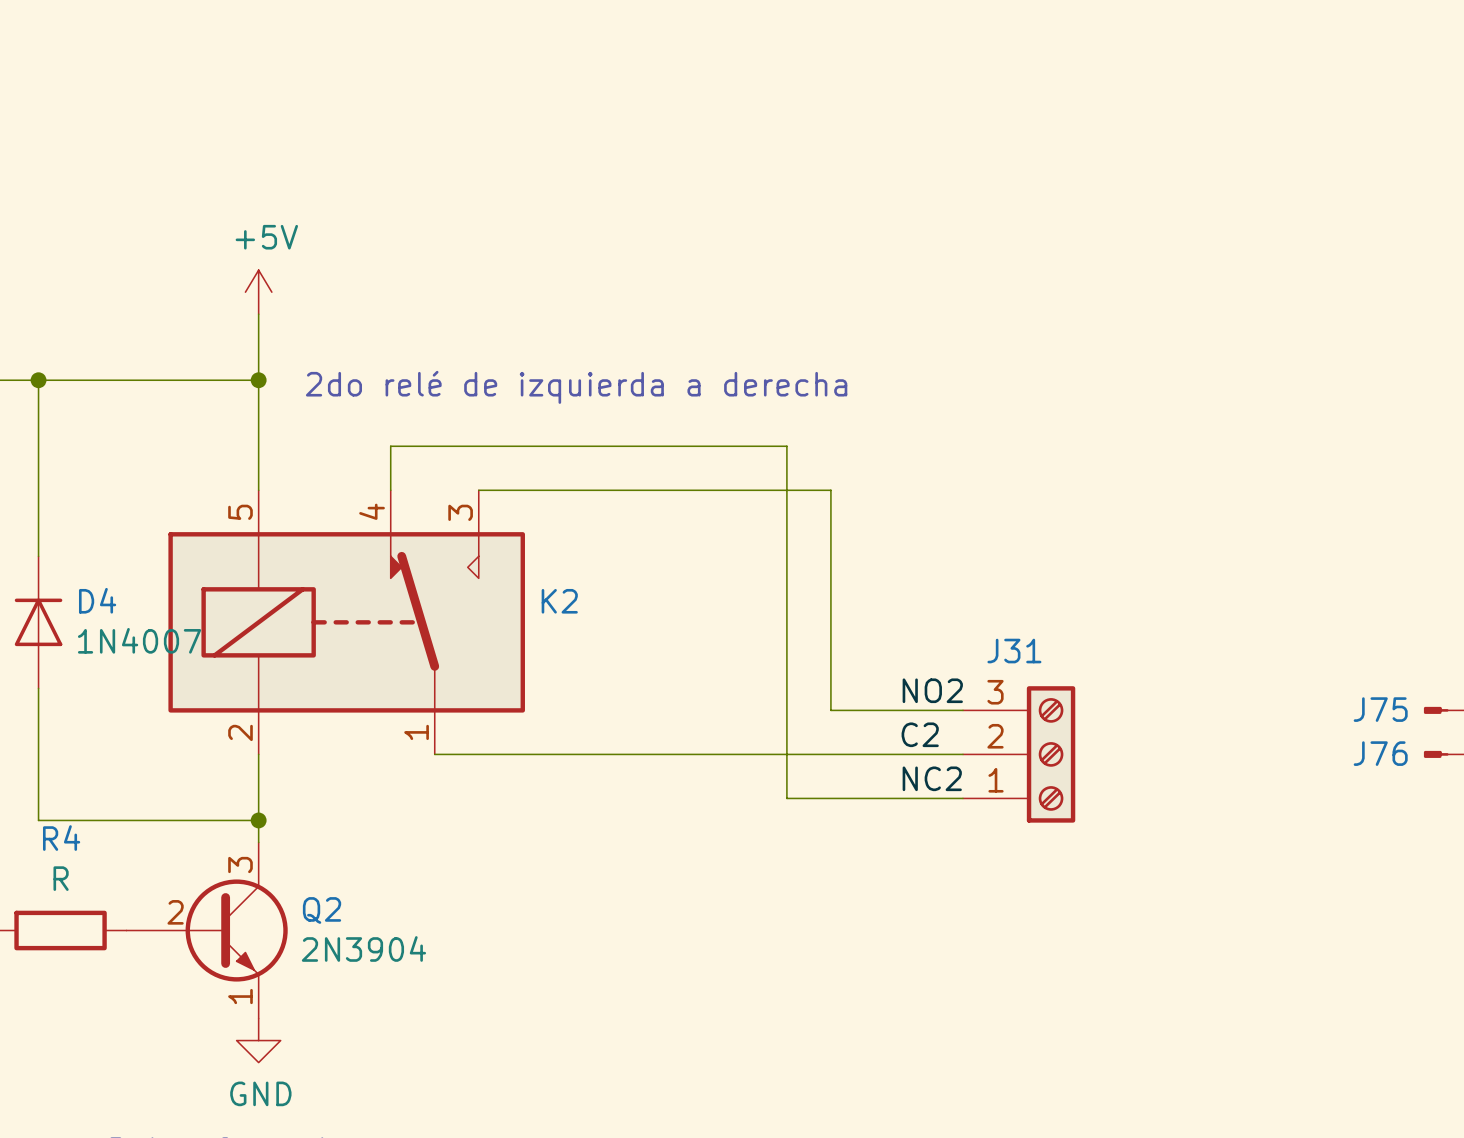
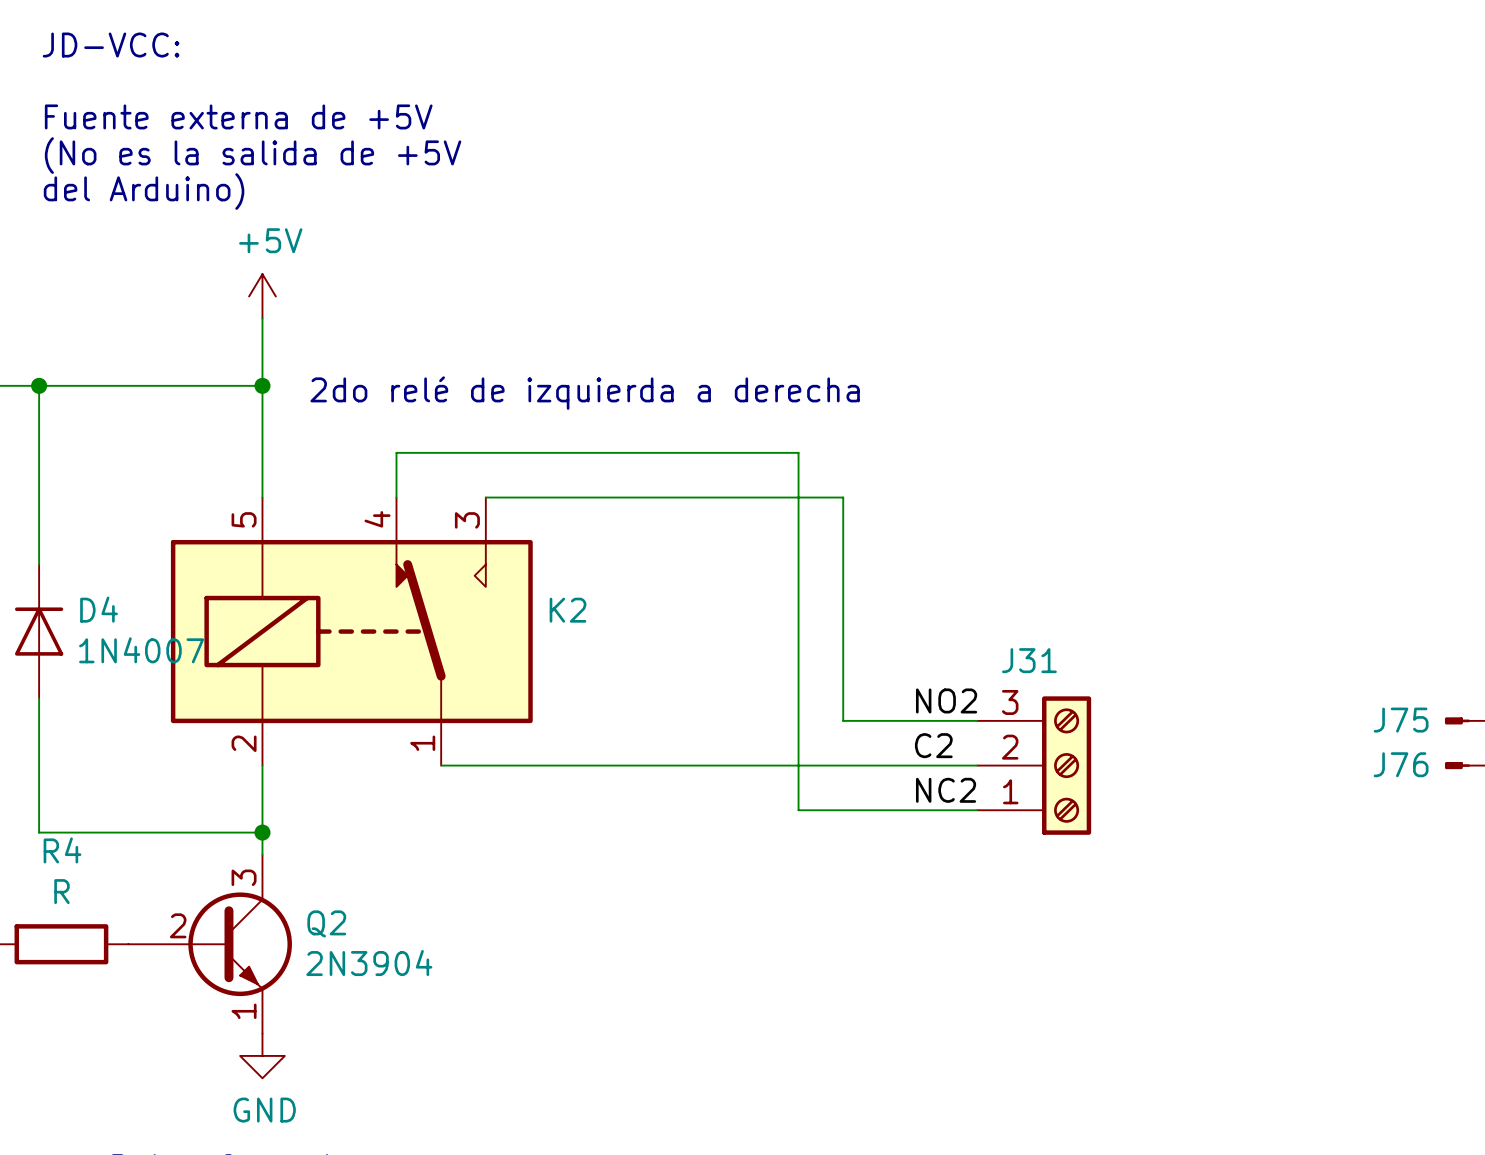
text: none -> JD-VCC: (111, 45)
text: none -> Fuente externa de +5V (238, 116)
text: none -> (No es la salida de +5V (253, 155)
text: none -> del Arduino) (144, 191)

